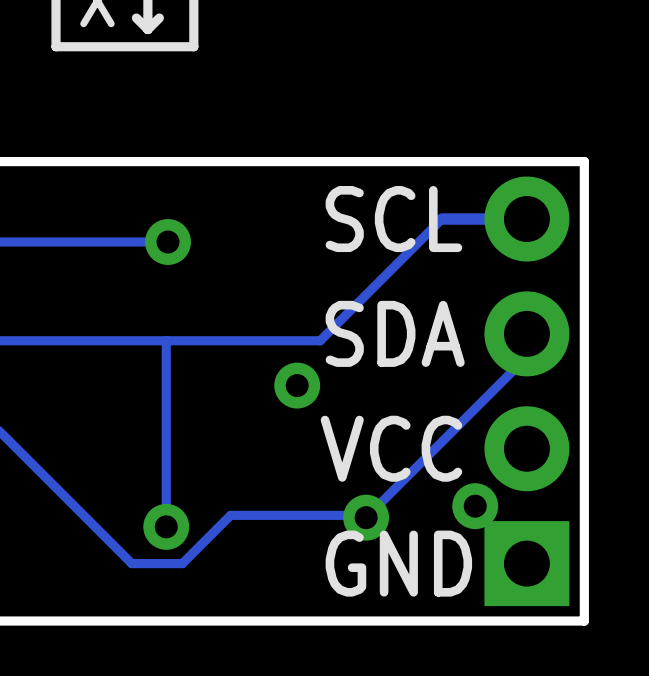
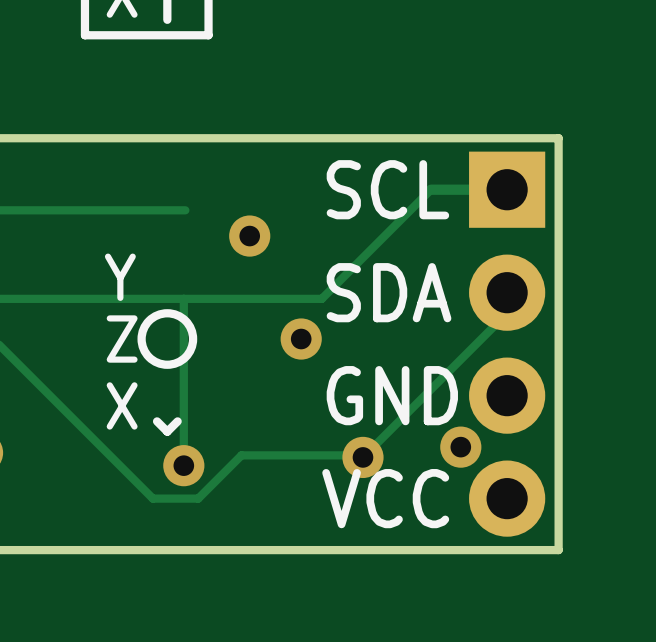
line: (159, 18) (147, 29) (136, 18) -> (177, 421) (167, 431) (157, 421)
via position: (167, 241) -> (249, 236)
text: none -> Y (120, 277)
drawing: none -> [137, 309, 198, 369]
text: none -> Z (122, 339)
part rotation: 0° (526, 391) -> 180° (507, 344)
text: VCC (391, 448) -> GND (392, 395)
text: none -> X (122, 405)
text: GND (398, 563) -> VCC (385, 498)

